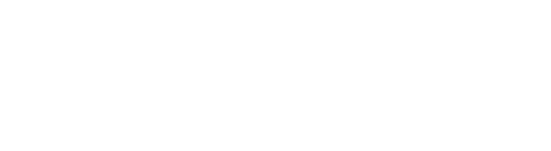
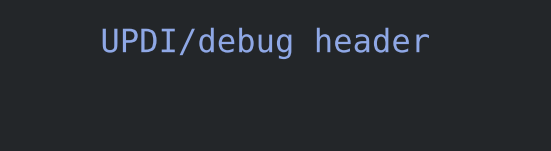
text: none -> UPDI/debug header (265, 43)

